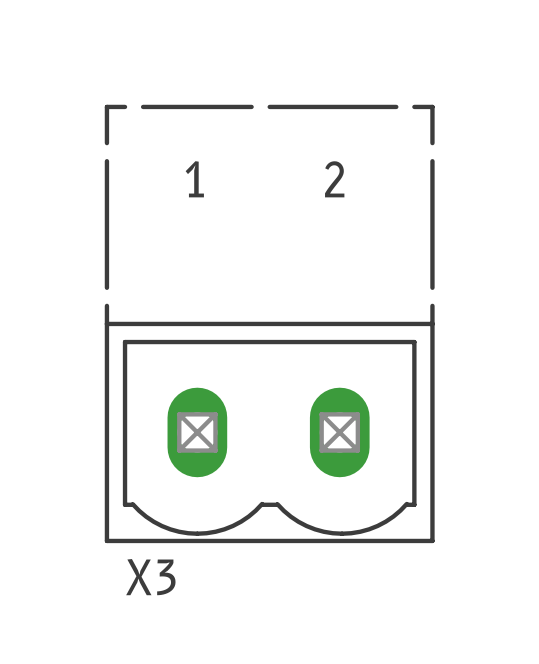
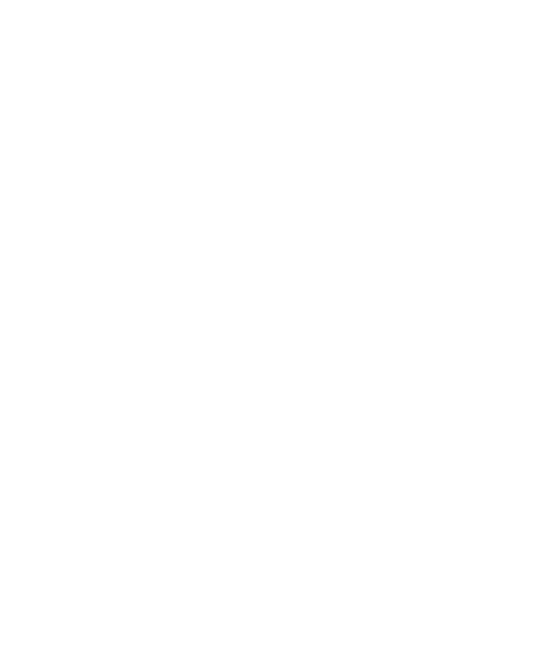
X3: (269, 323) -> none

